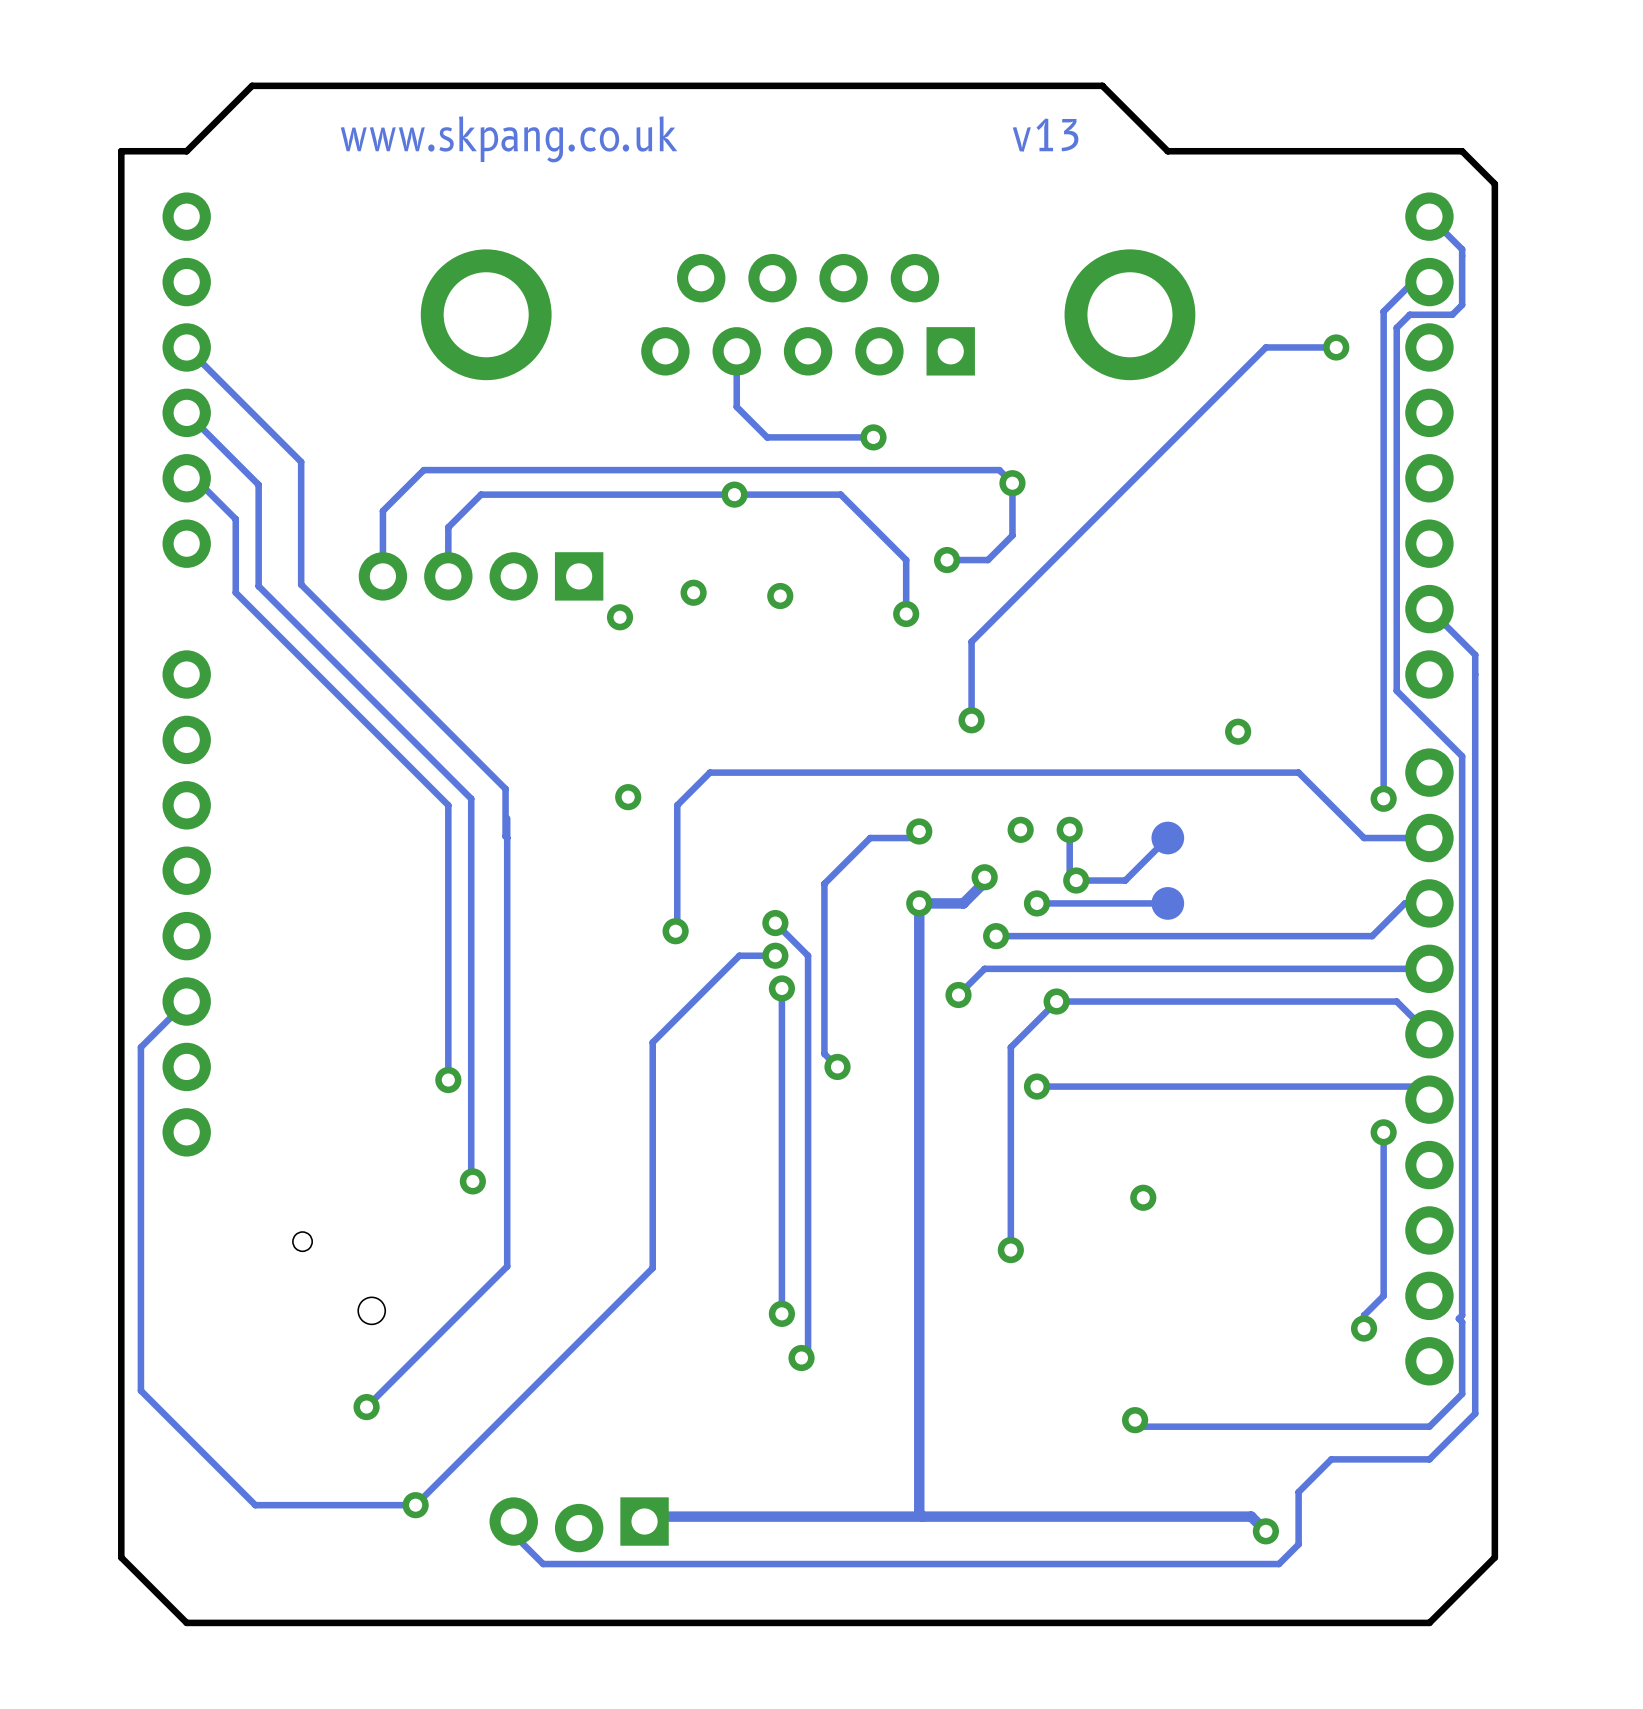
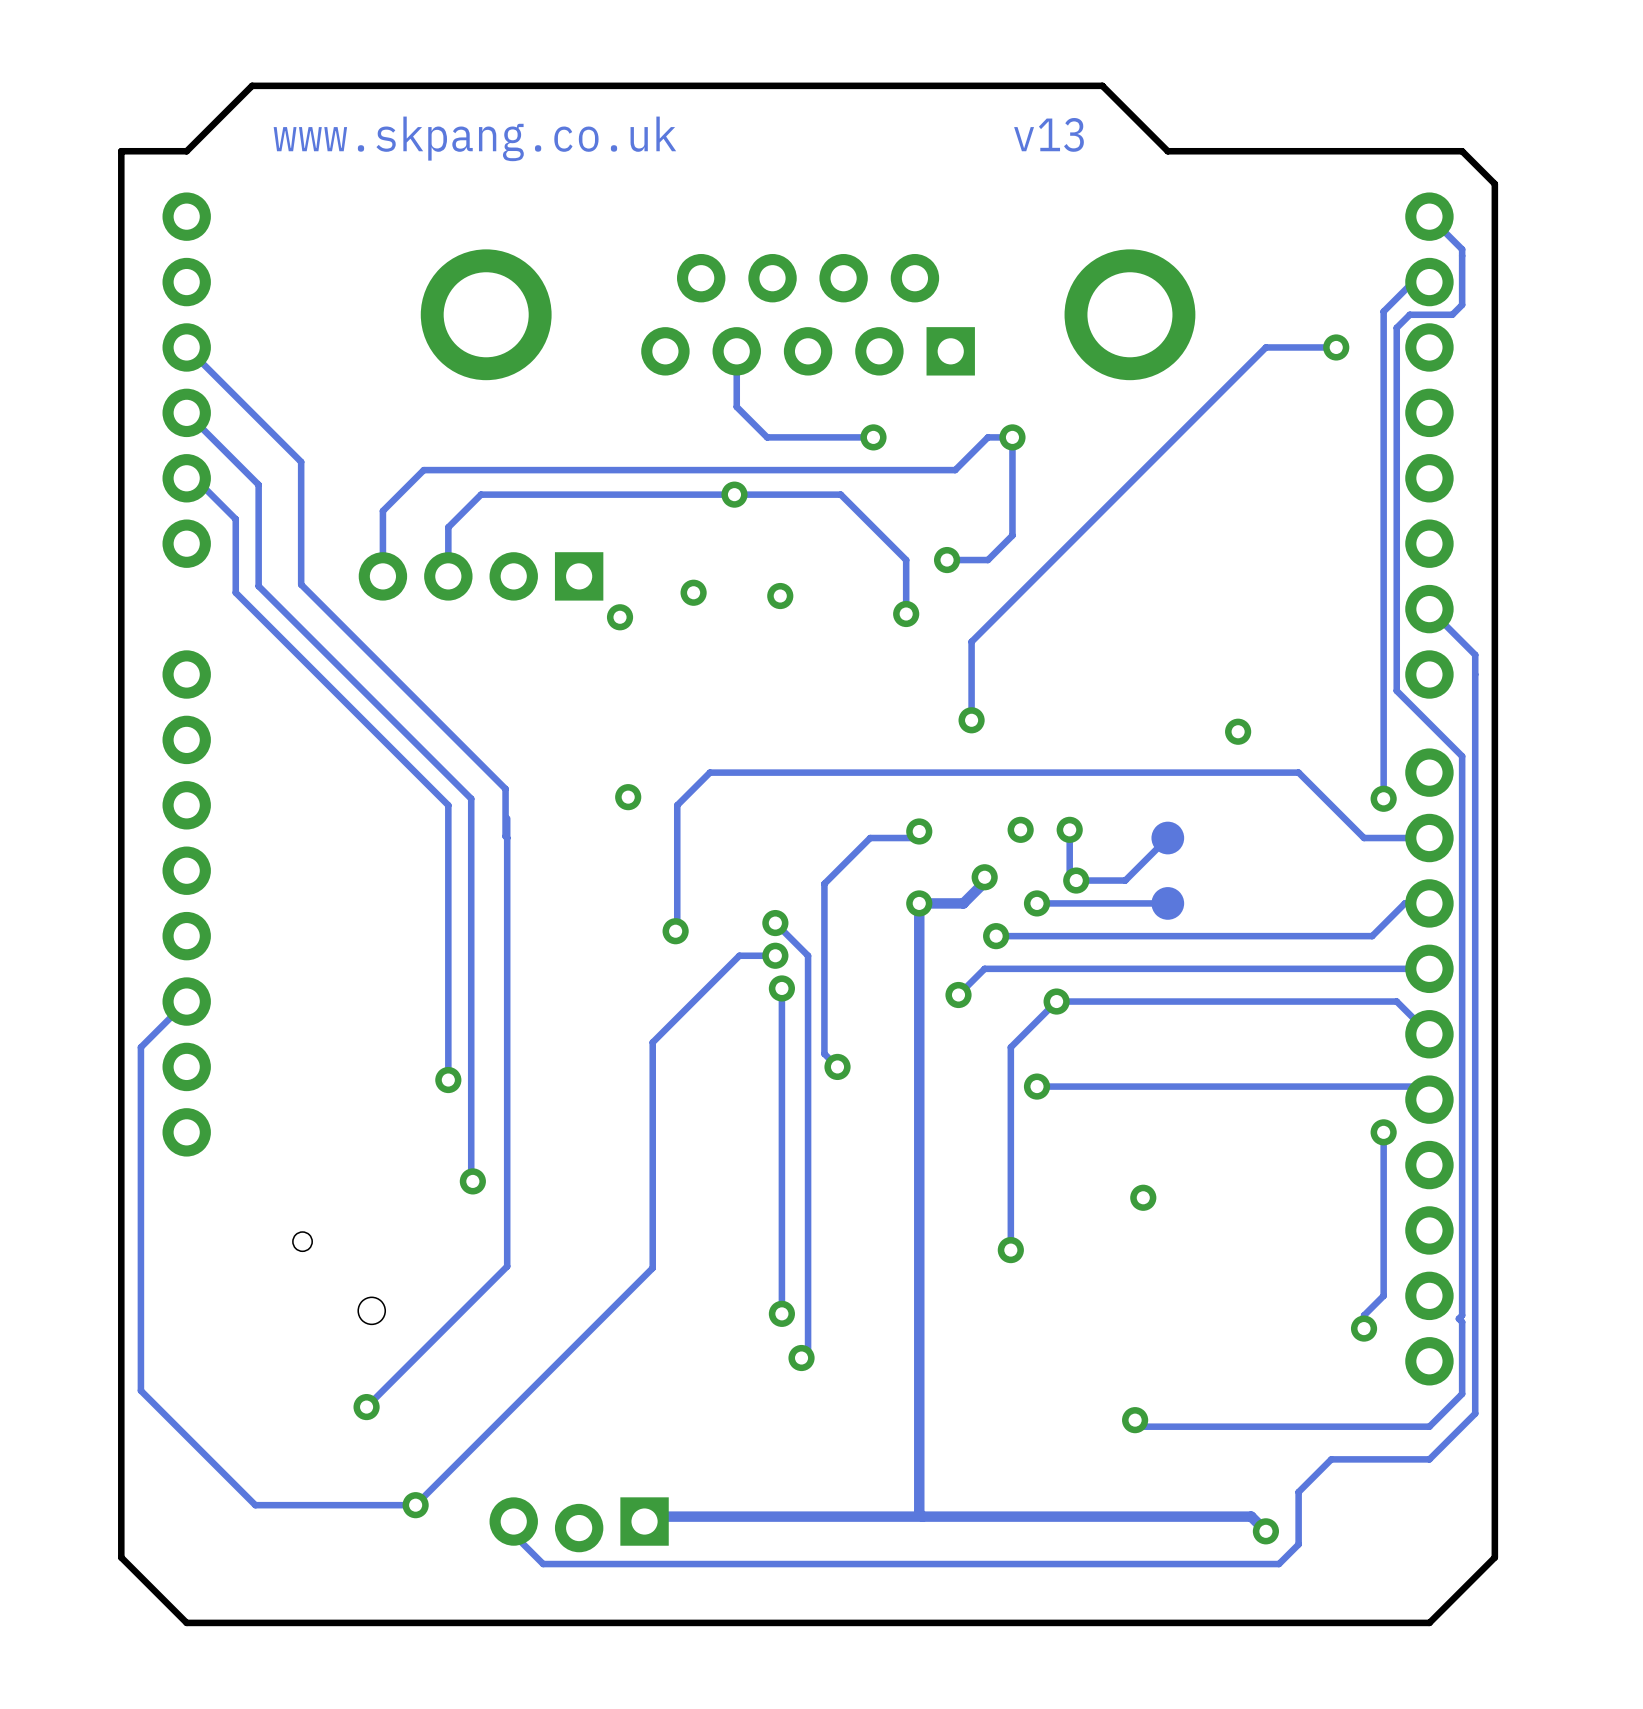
track: (955, 470) (999, 470) (1012, 483) -> (955, 470) (987, 437) (1012, 437) (1012, 483)
via position: (1012, 483) -> (1012, 437)

